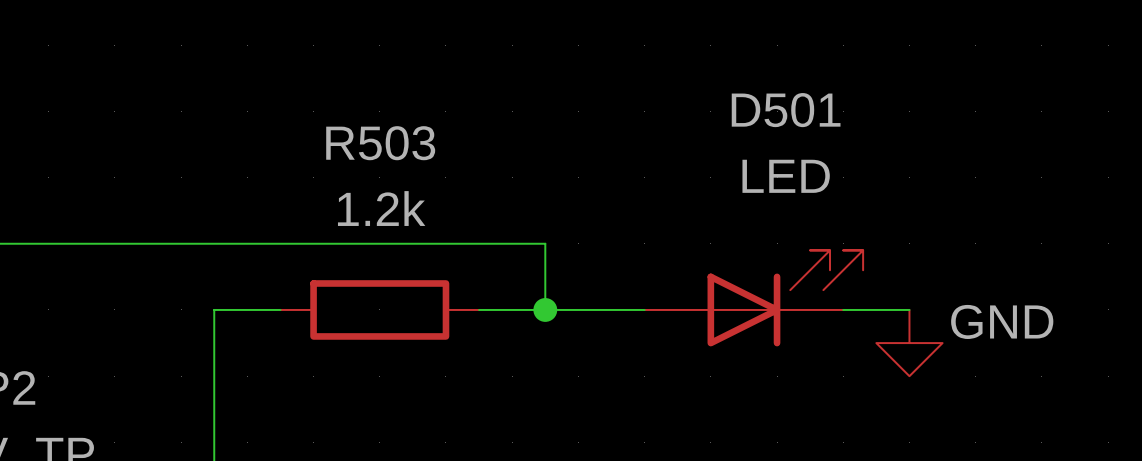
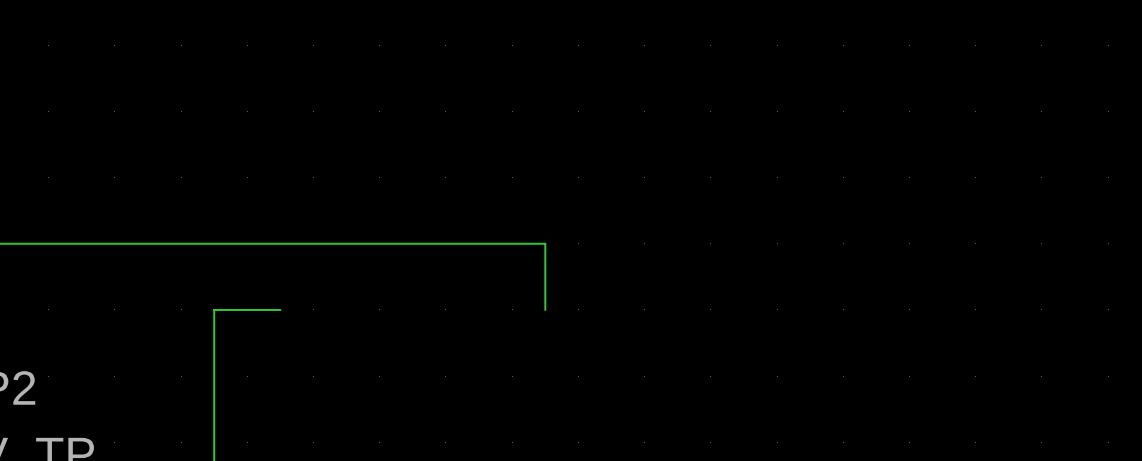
D501: LED (753, 298) -> none
R503: 1.2k (379, 309) -> none
wire: (479, 309) (644, 309) -> none
junction: (545, 309) -> none
wire: (843, 309) (909, 309) -> none
power symbol: GND (909, 343) -> none

